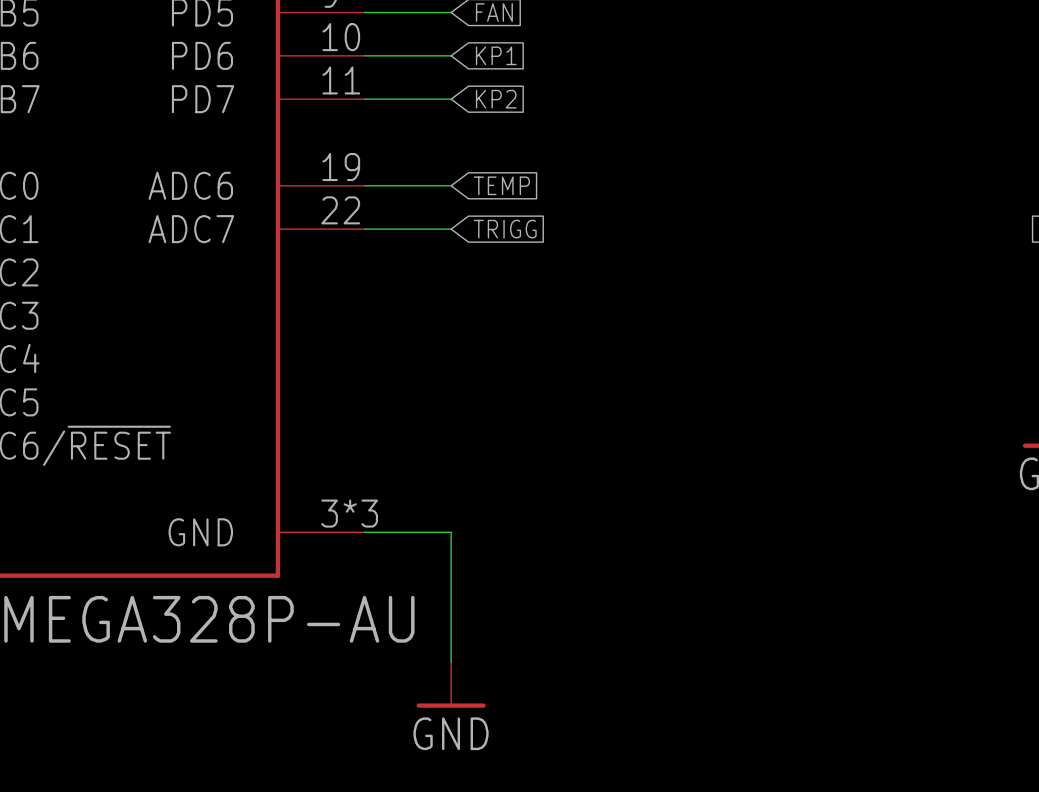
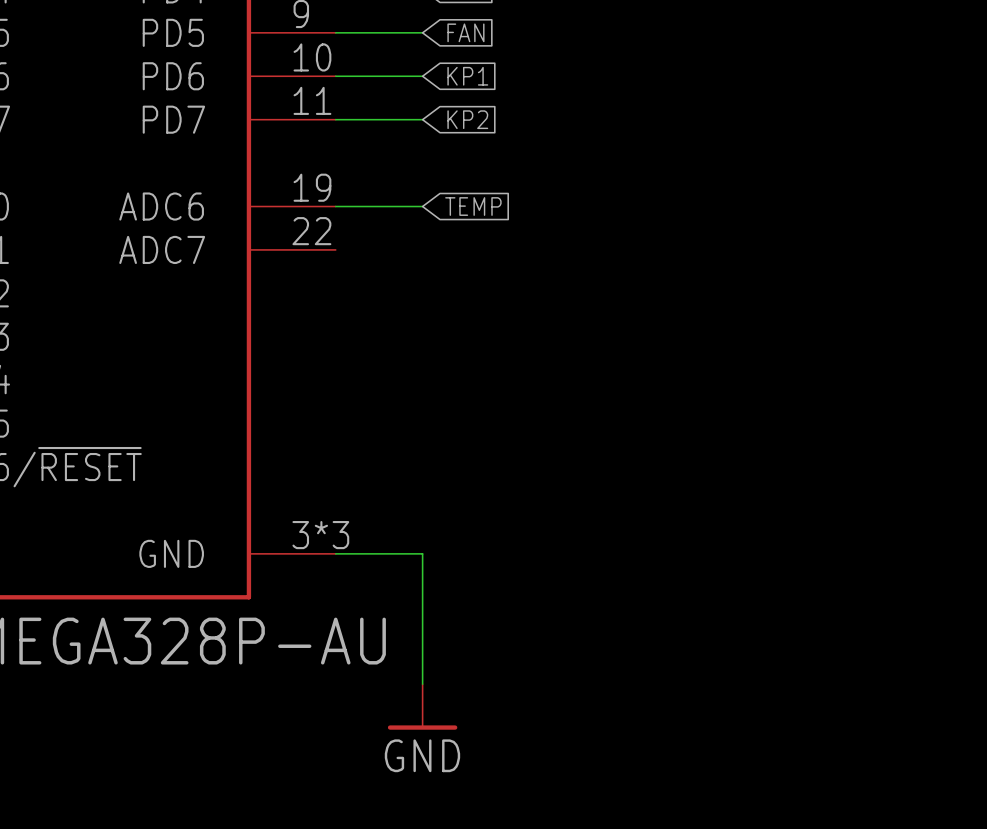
wire: (364, 229) (451, 229) -> none
global label: TRIGG (505, 229) -> none

